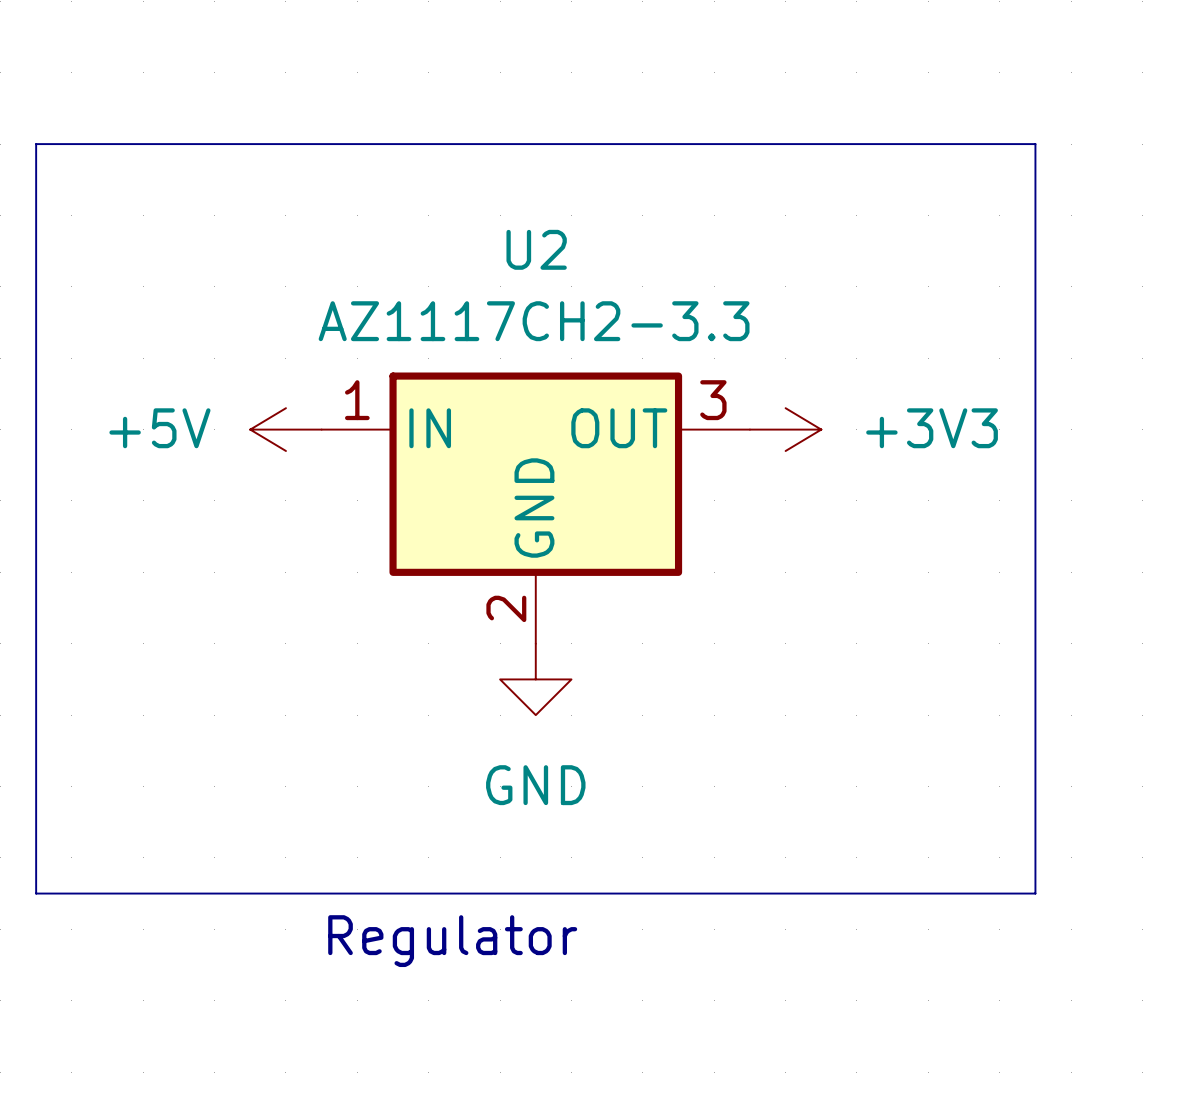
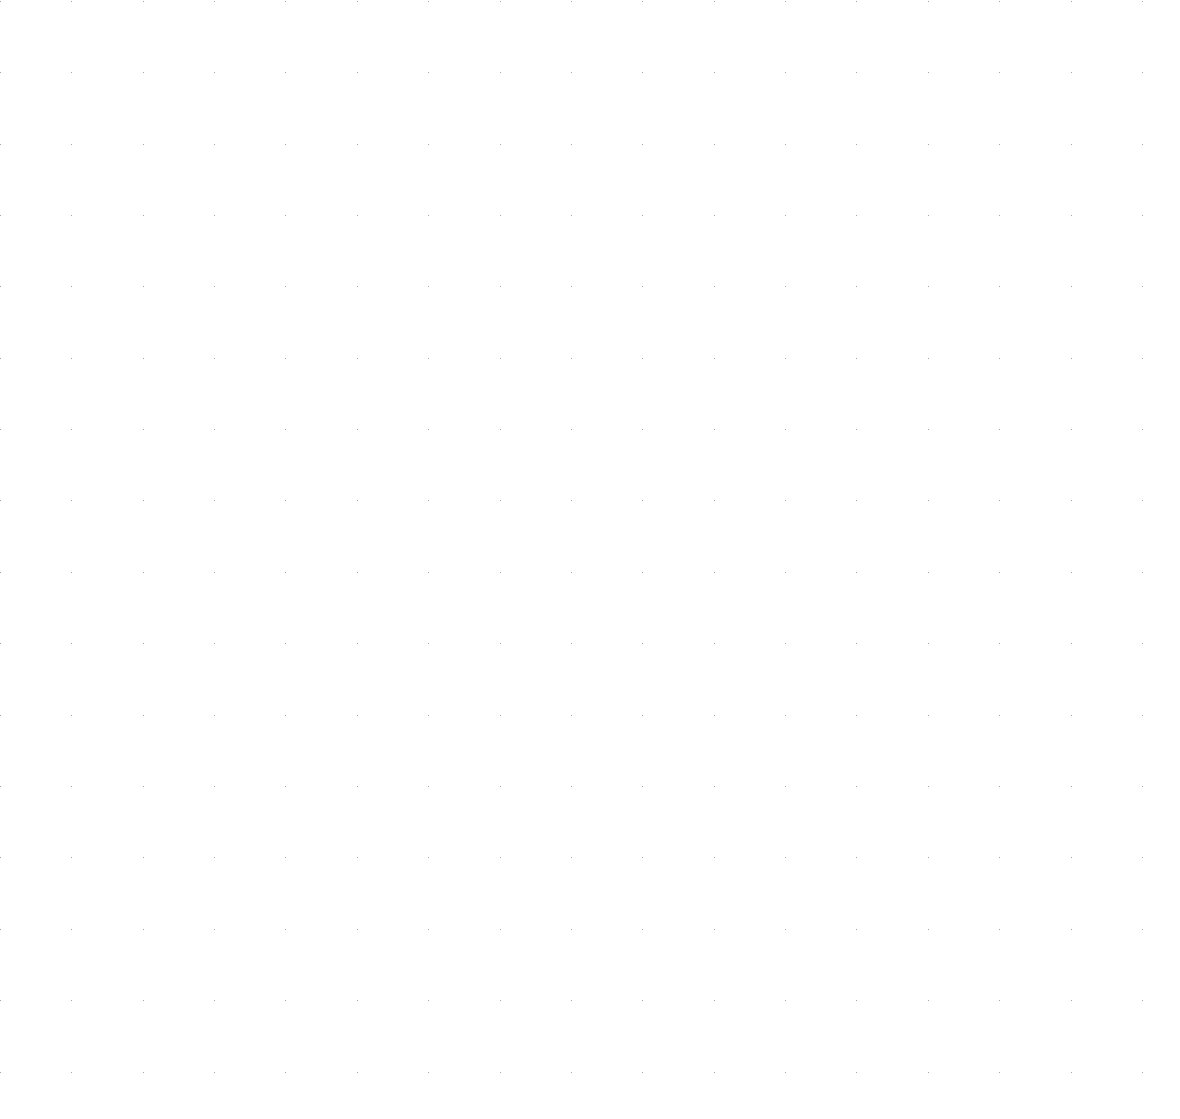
line: (36, 144) (1035, 144) (1035, 893) (36, 893) (36, 144) -> none
power symbol: +5V (285, 429) -> none
power symbol: +3V3 (785, 429) -> none
U2: AZ1117CH2-3.3 (535, 508) -> none
power symbol: GND (535, 679) -> none
text: Regulator (452, 941) -> none

